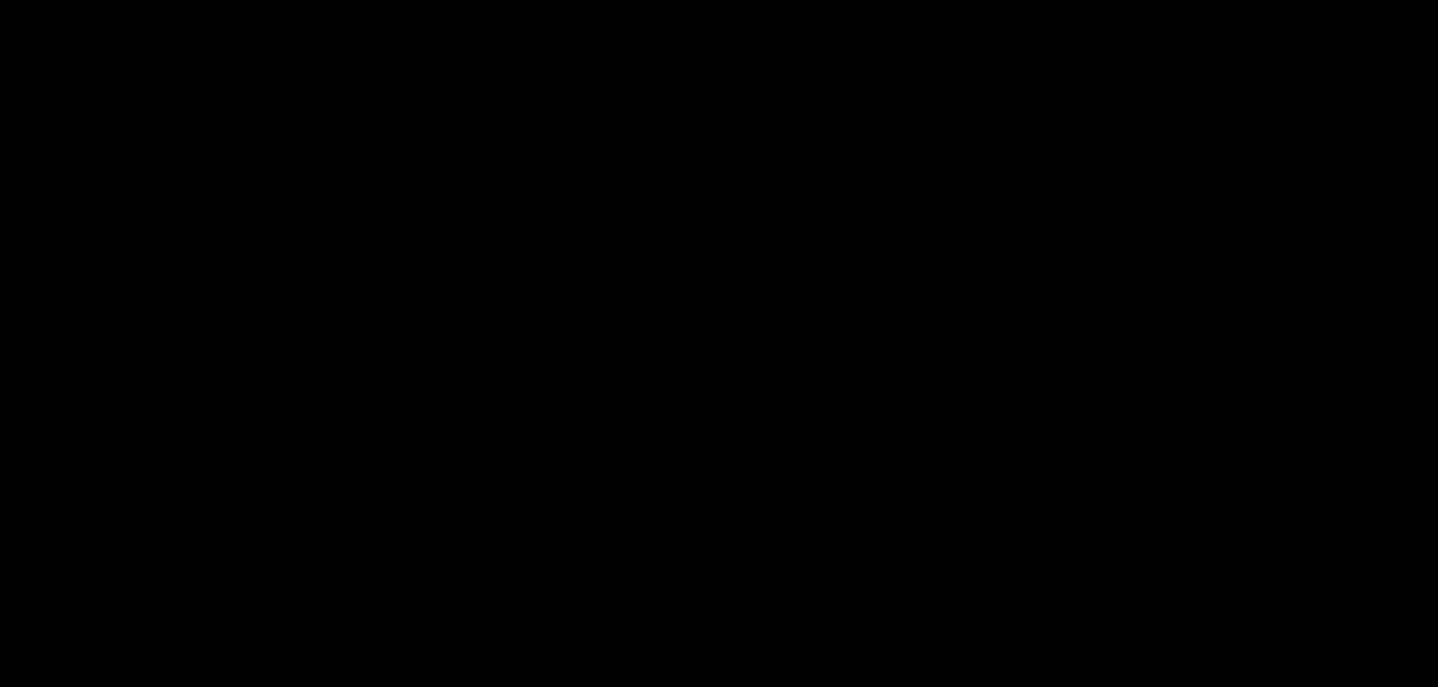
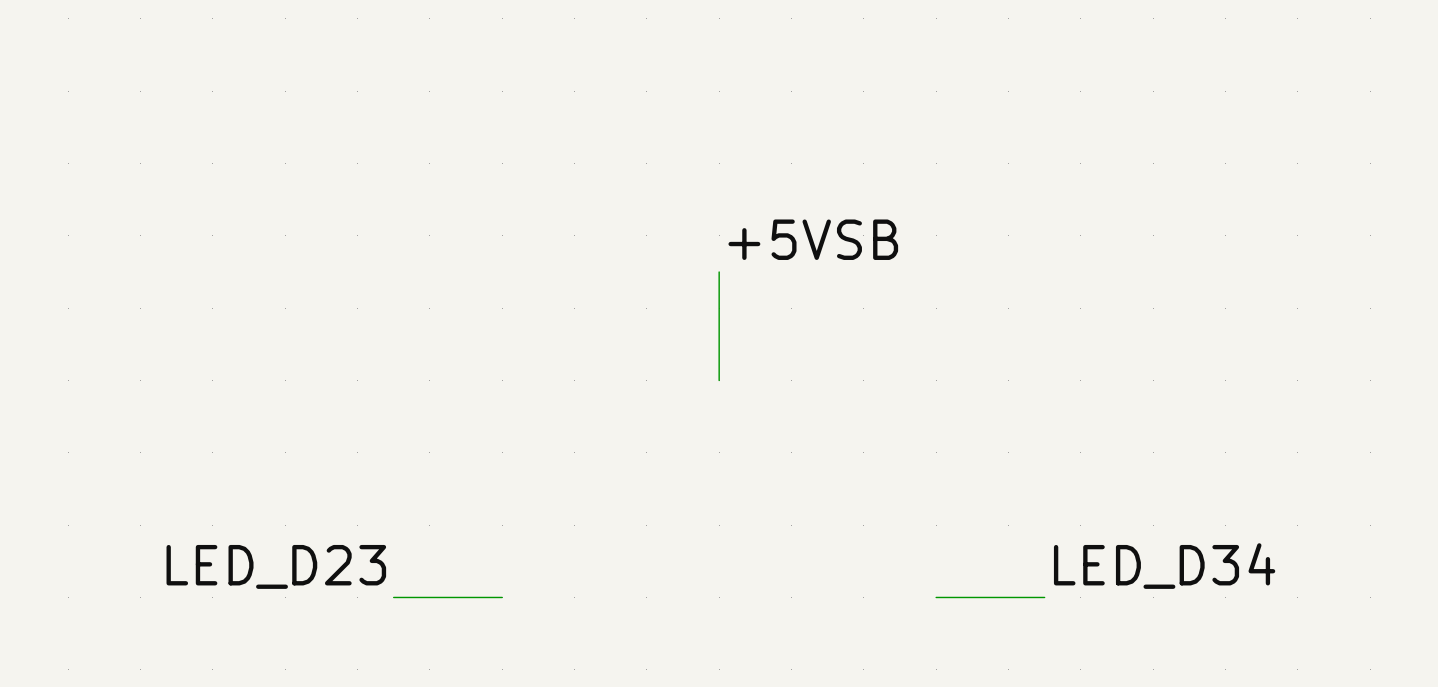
label: none -> +5VSB (813, 239)
wire: none -> (719, 272) (719, 380)
label: none -> LED_D23 (276, 566)
label: none -> LED_D34 (1164, 566)
wire: none -> (393, 597) (502, 597)
wire: none -> (936, 597) (1044, 597)

